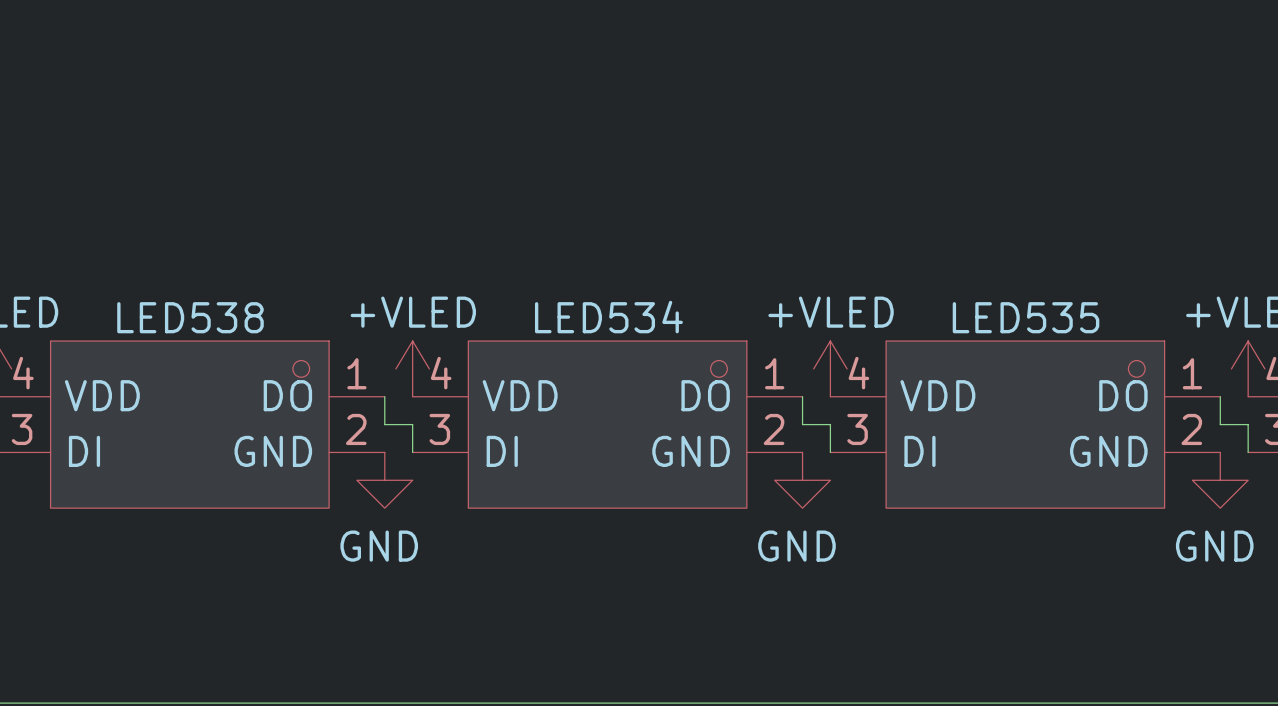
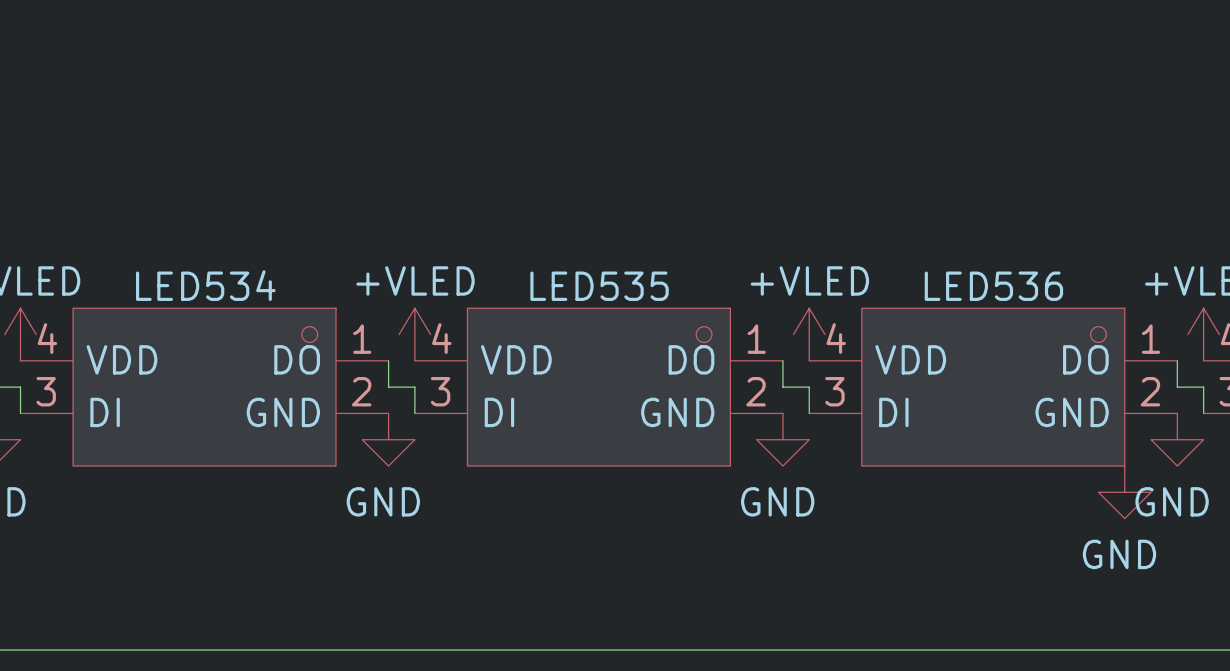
LED538 name: LED538 (190, 317) -> LED534 (205, 285)
LED534 name: LED534 (608, 317) -> LED535 (599, 286)
LED535 name: LED535 (1026, 317) -> LED536 (993, 286)
power symbol: none -> GND (1124, 492)

